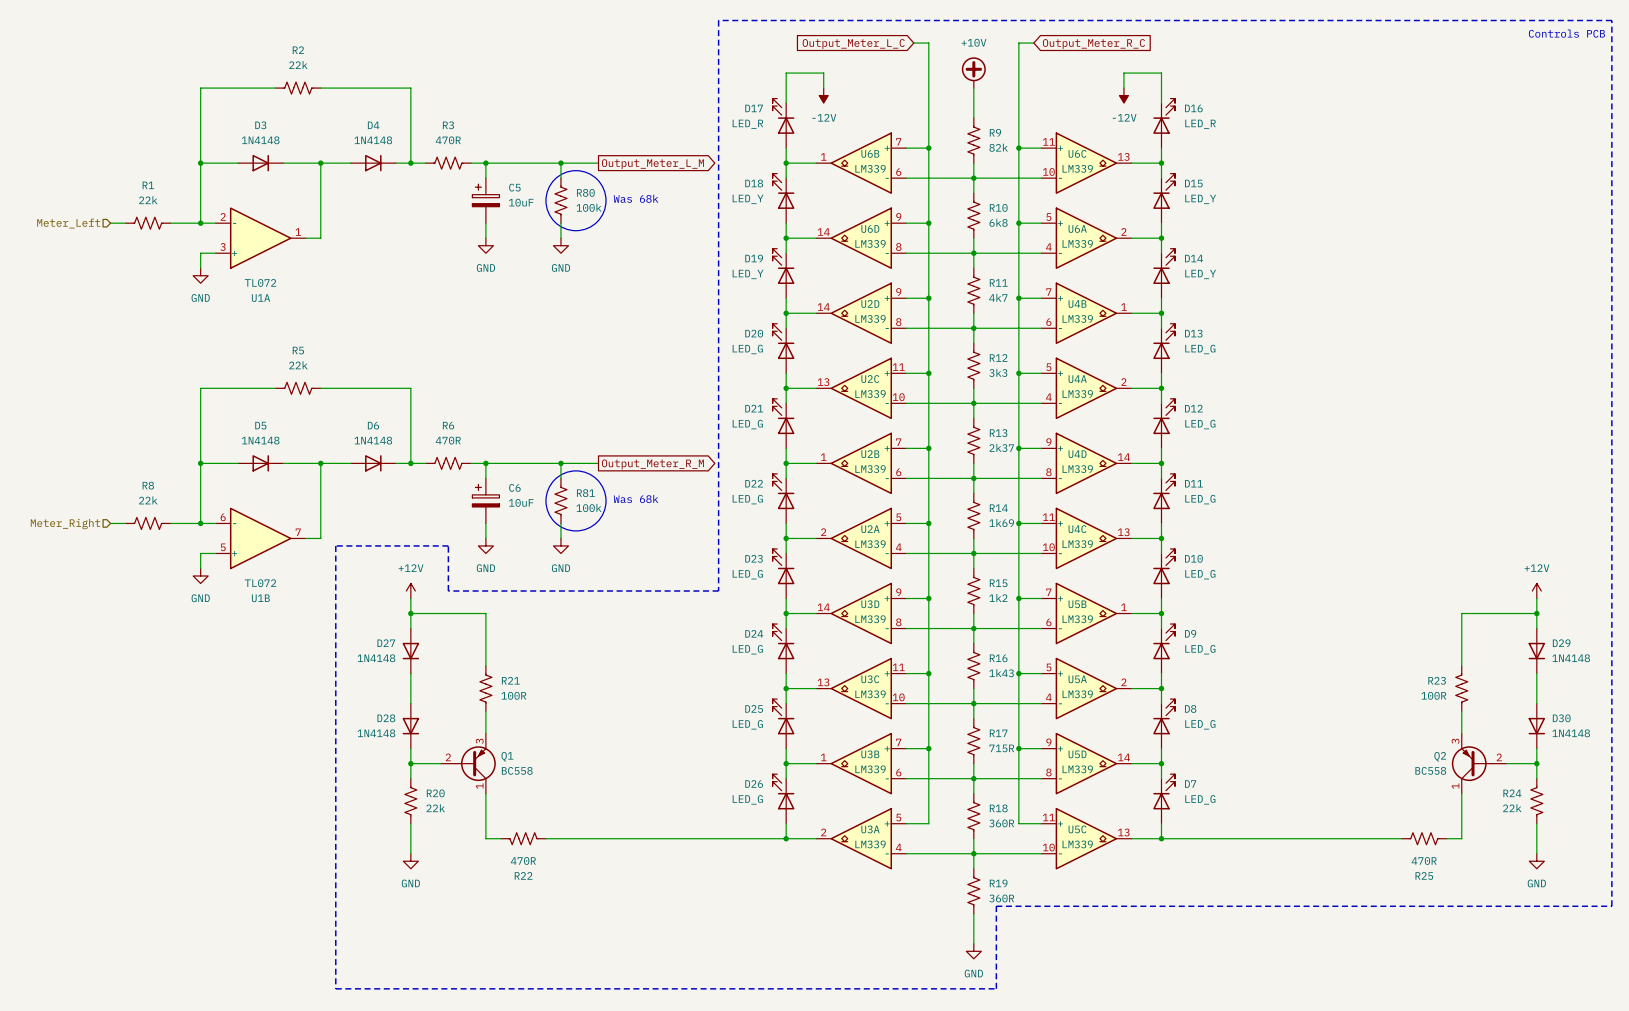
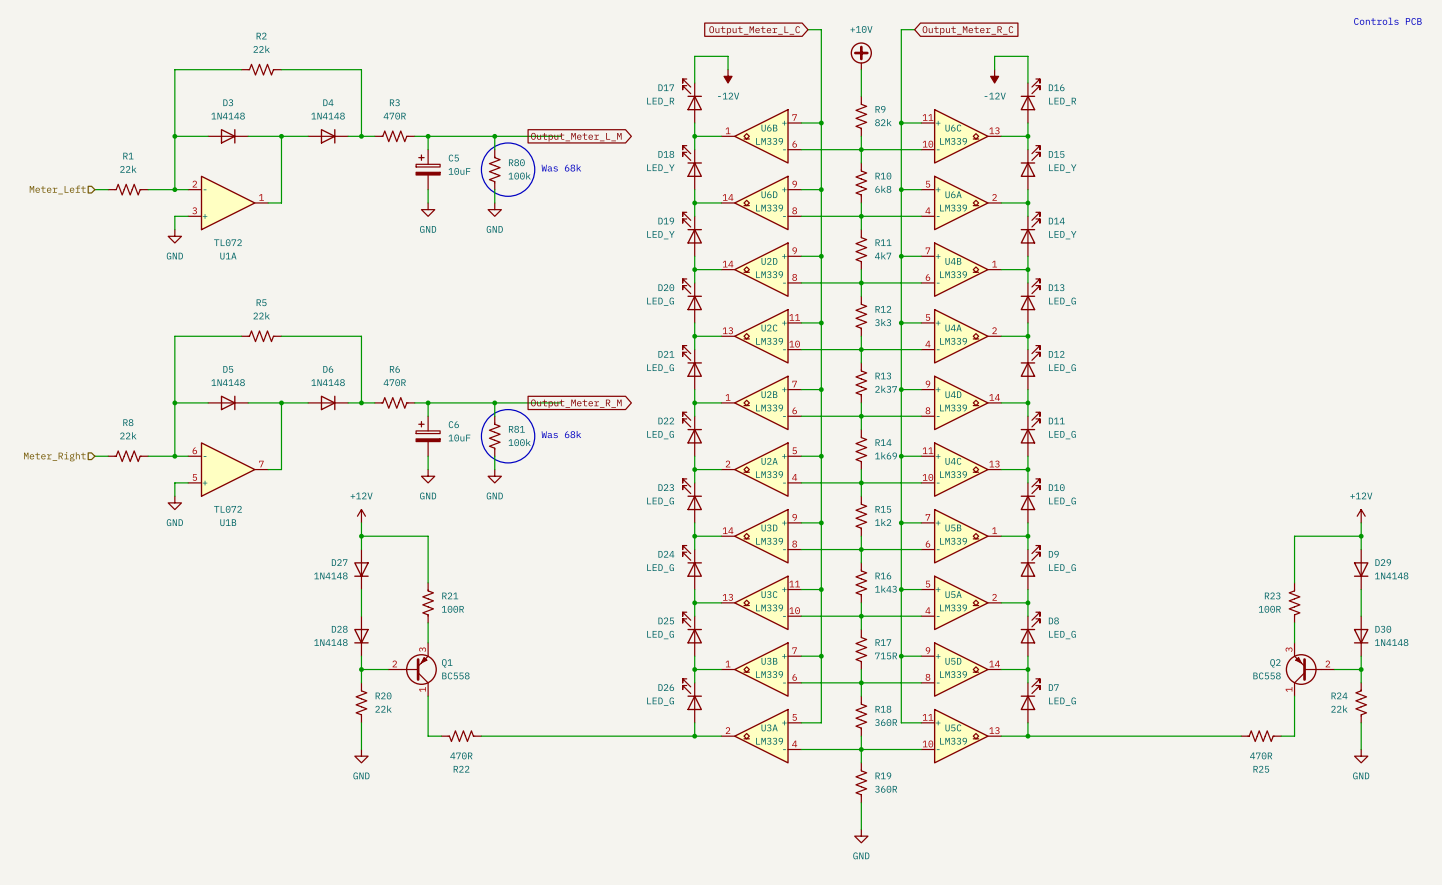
line: (718, 20) (718, 591) (448, 591) (448, 545) (335, 545) (335, 988) (996, 988) (996, 906) (1611, 906) (1611, 20) (718, 20) -> none
wire: none -> (528, 136) (561, 136)
wire: none -> (528, 402) (561, 402)

